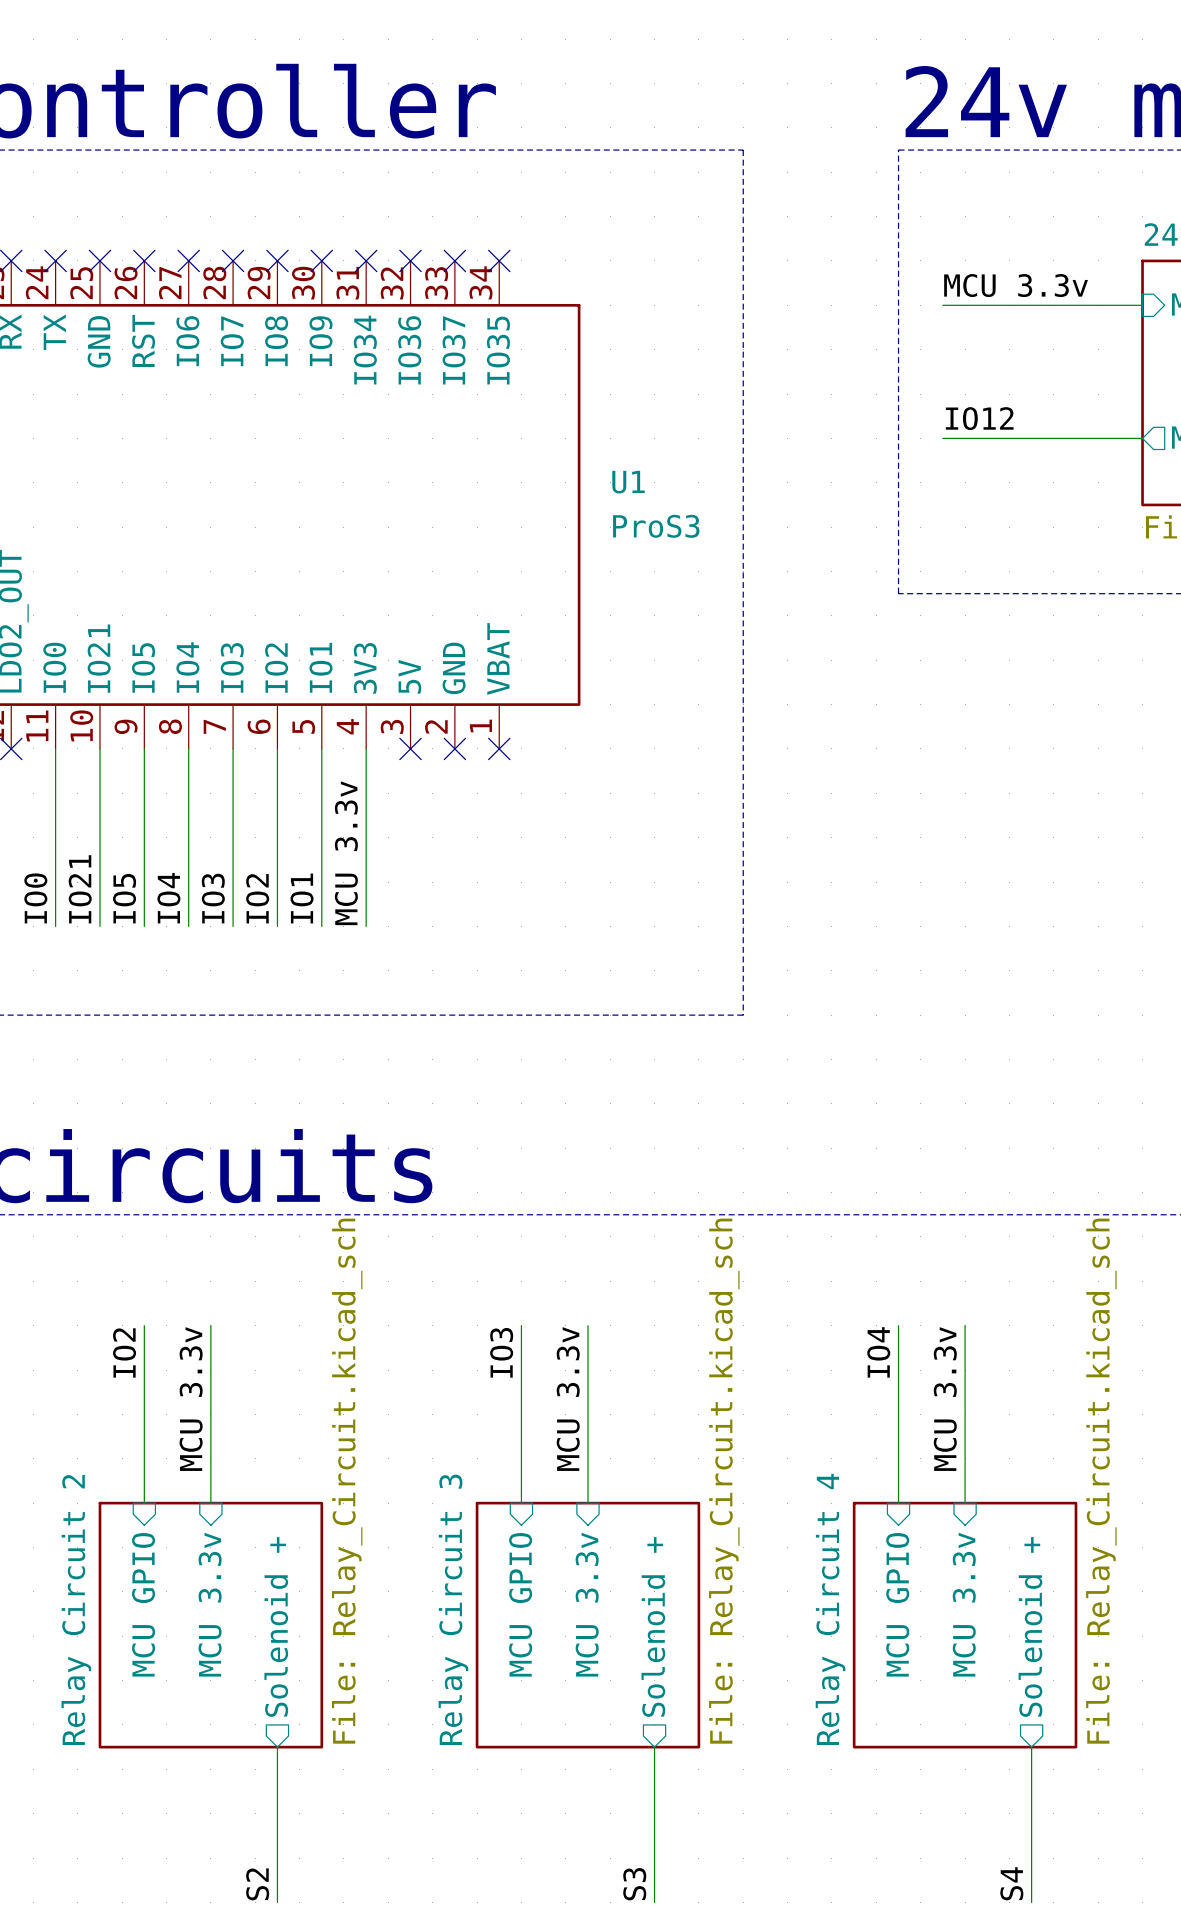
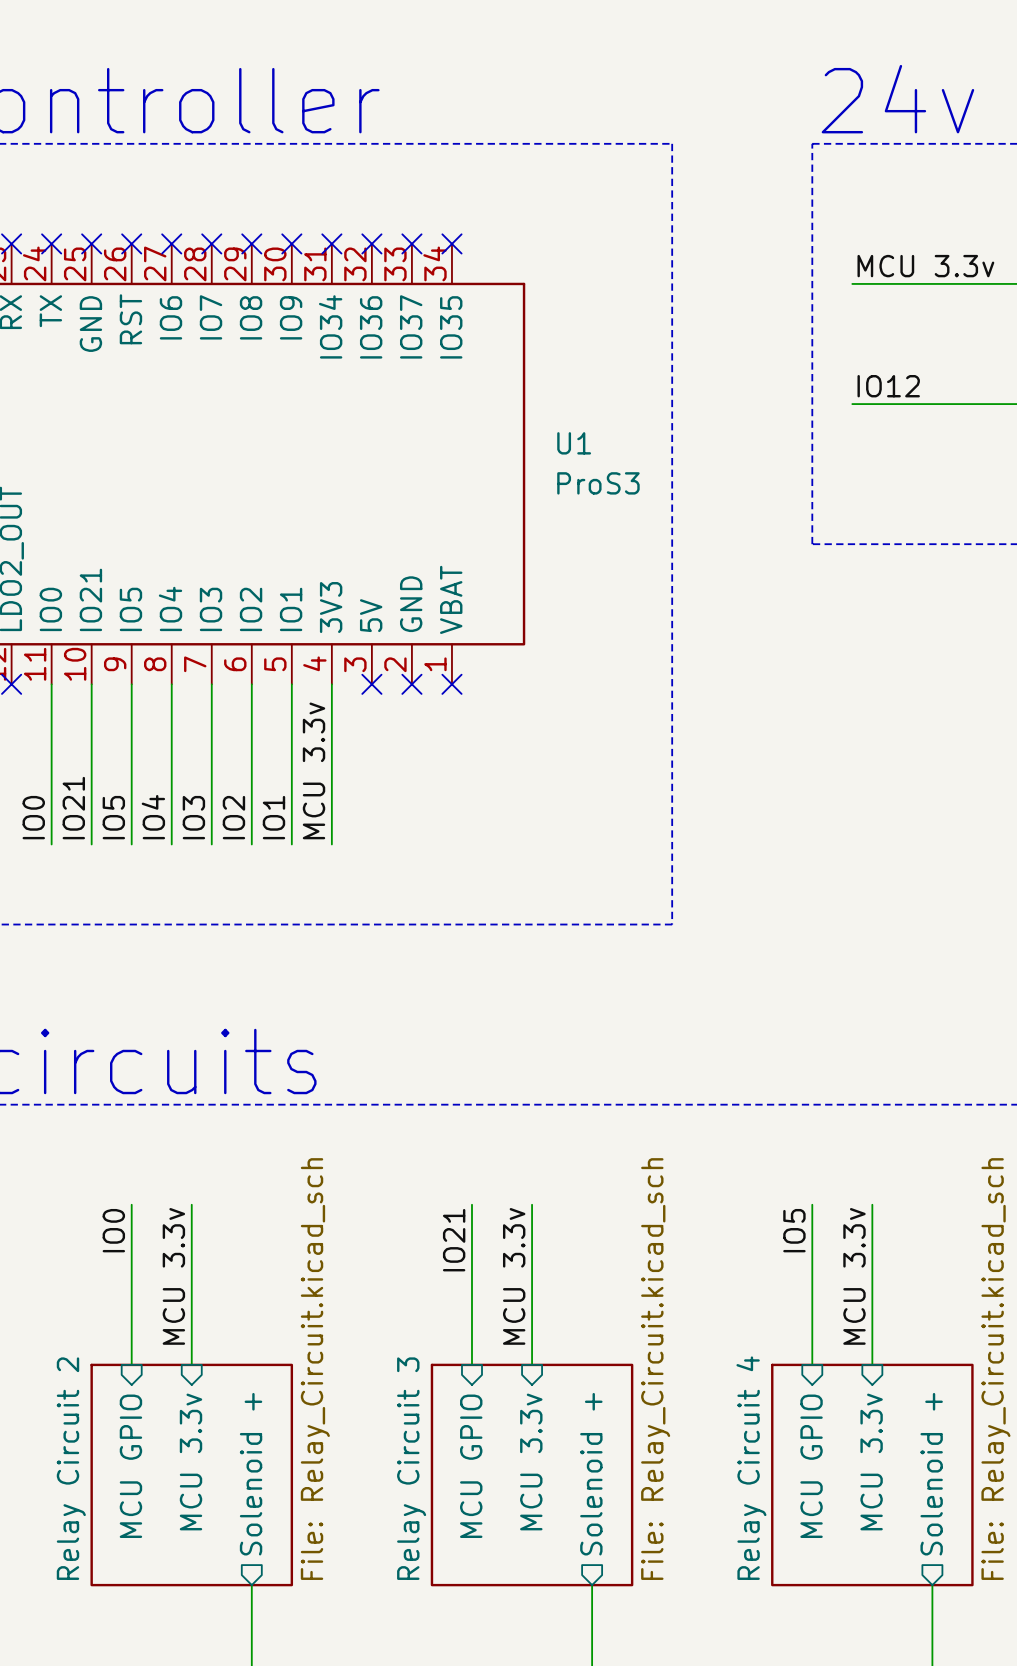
label: IO2 (124, 1352) -> IO0 (113, 1230)
label: IO3 (501, 1352) -> IO21 (454, 1240)
label: IO4 (878, 1352) -> IO5 (794, 1230)

